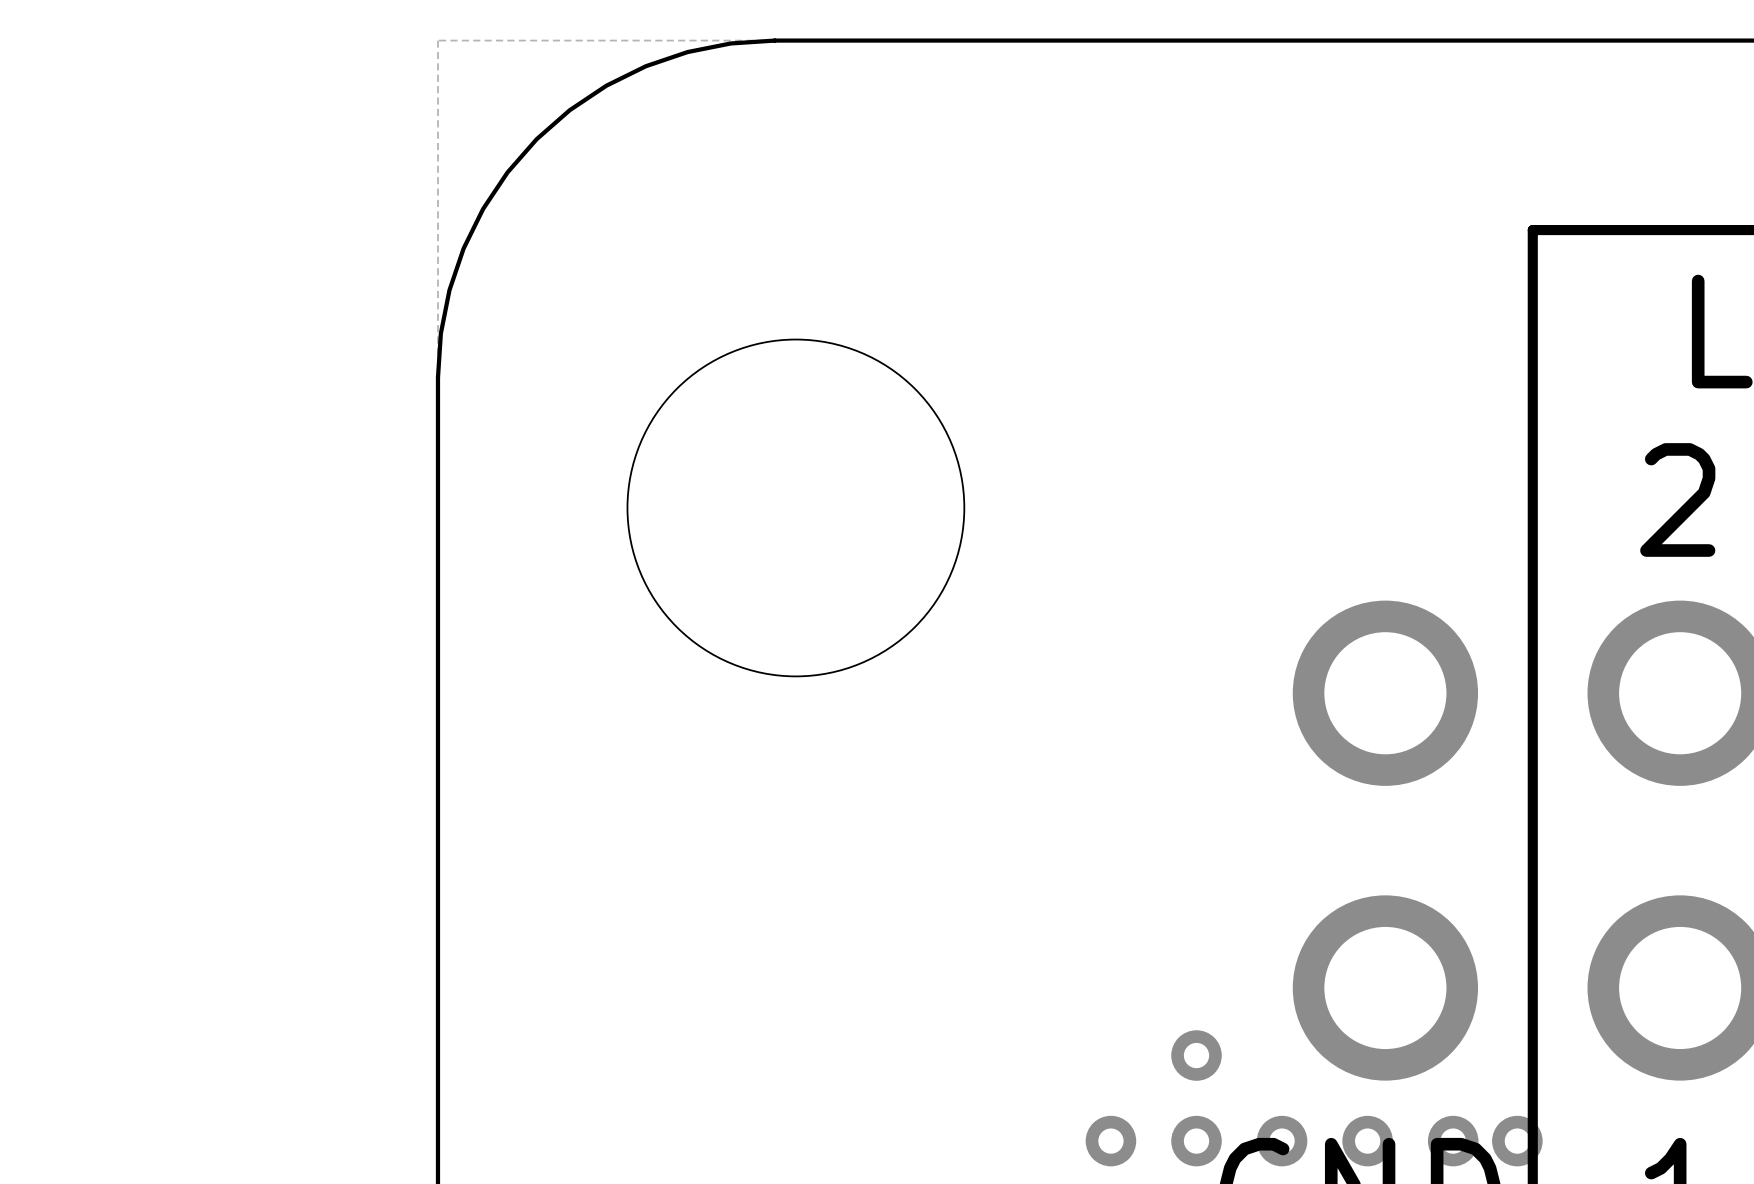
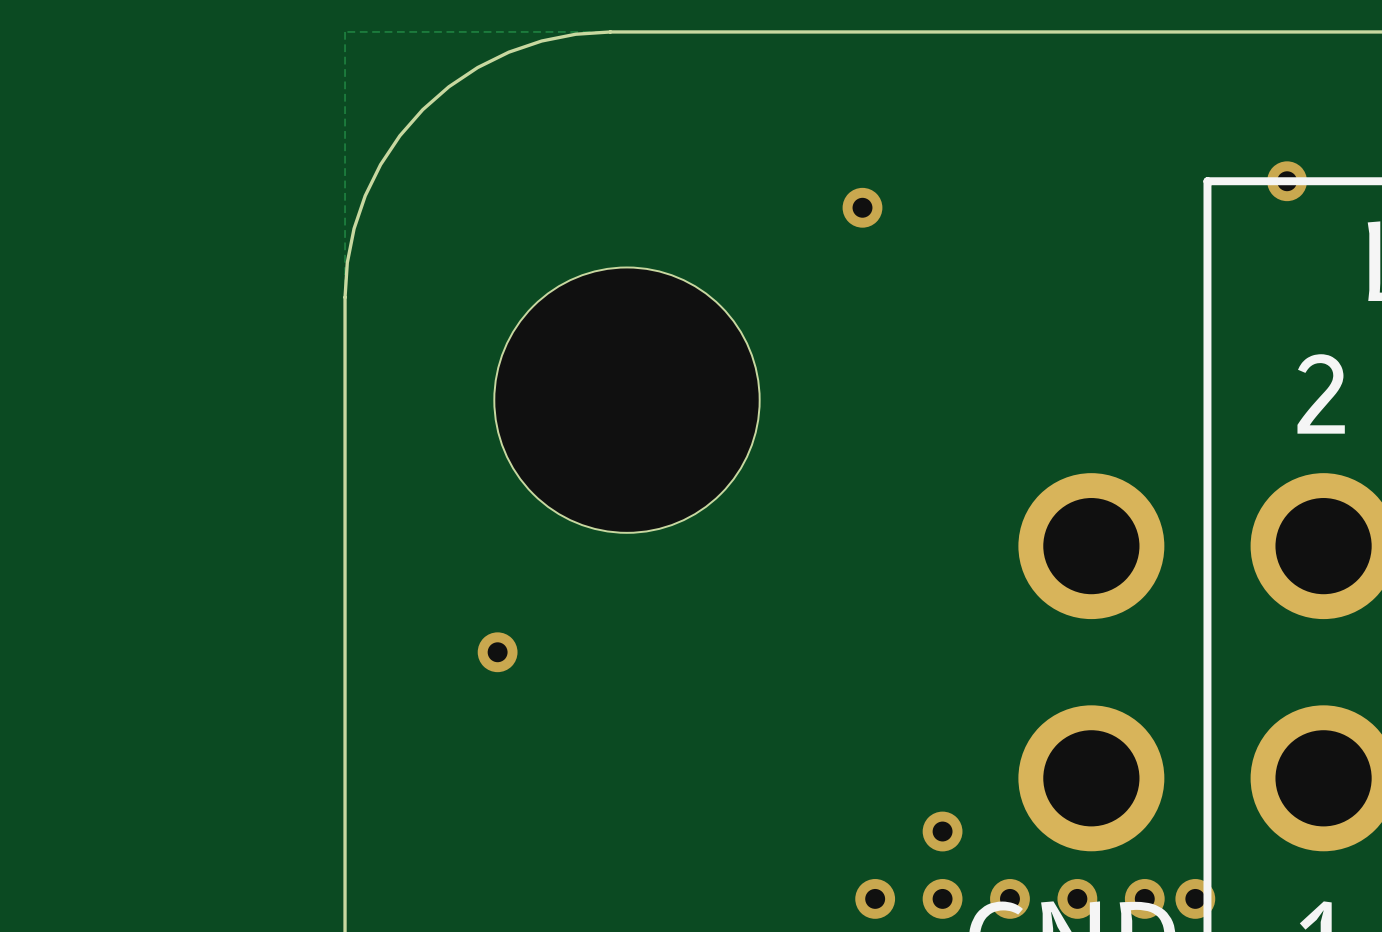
via: none -> (1287, 181)
via: none -> (862, 207)
via: none -> (497, 652)

